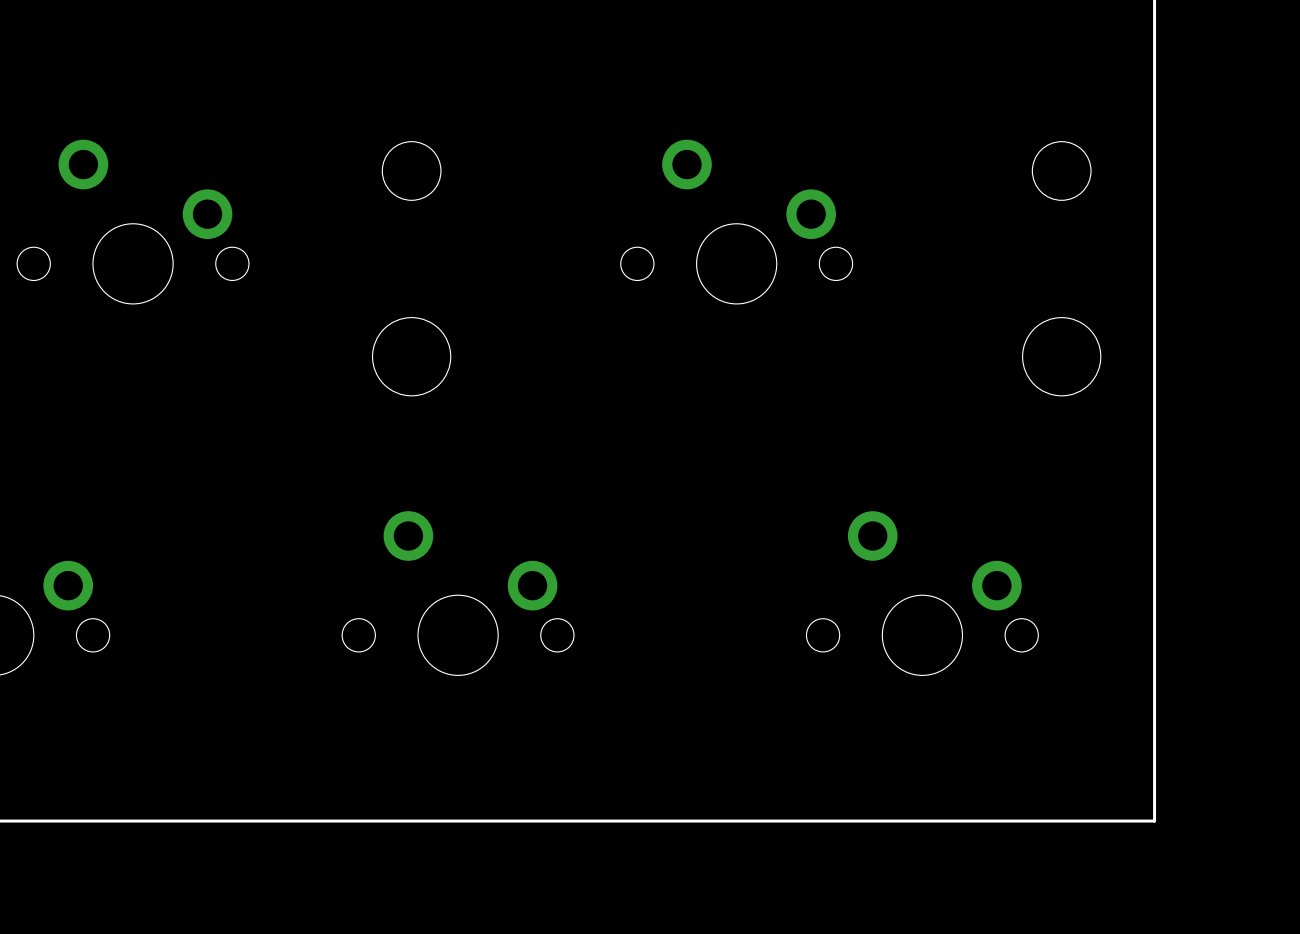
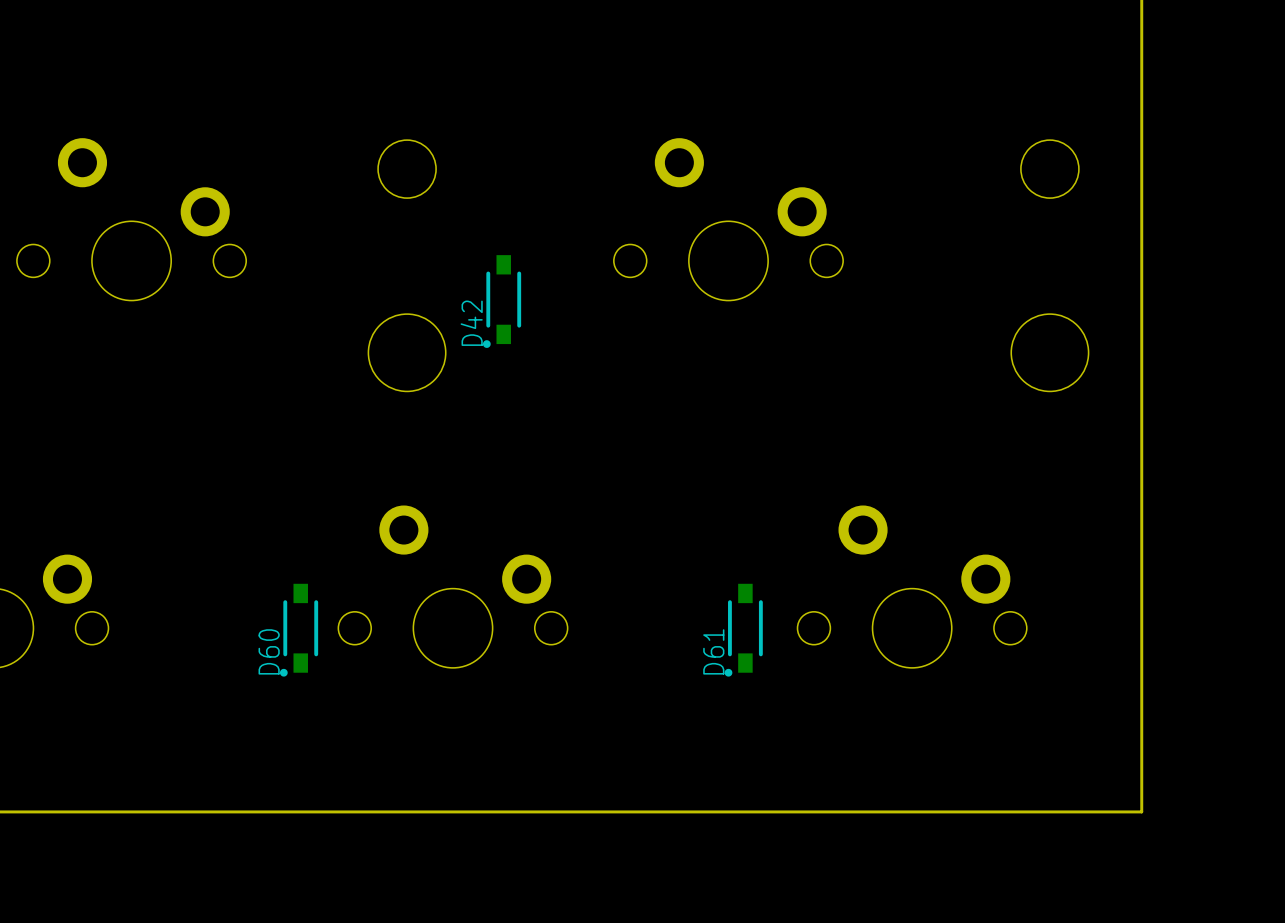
D42: none -> (502, 301)
D60: none -> (299, 630)
D61: none -> (743, 630)

